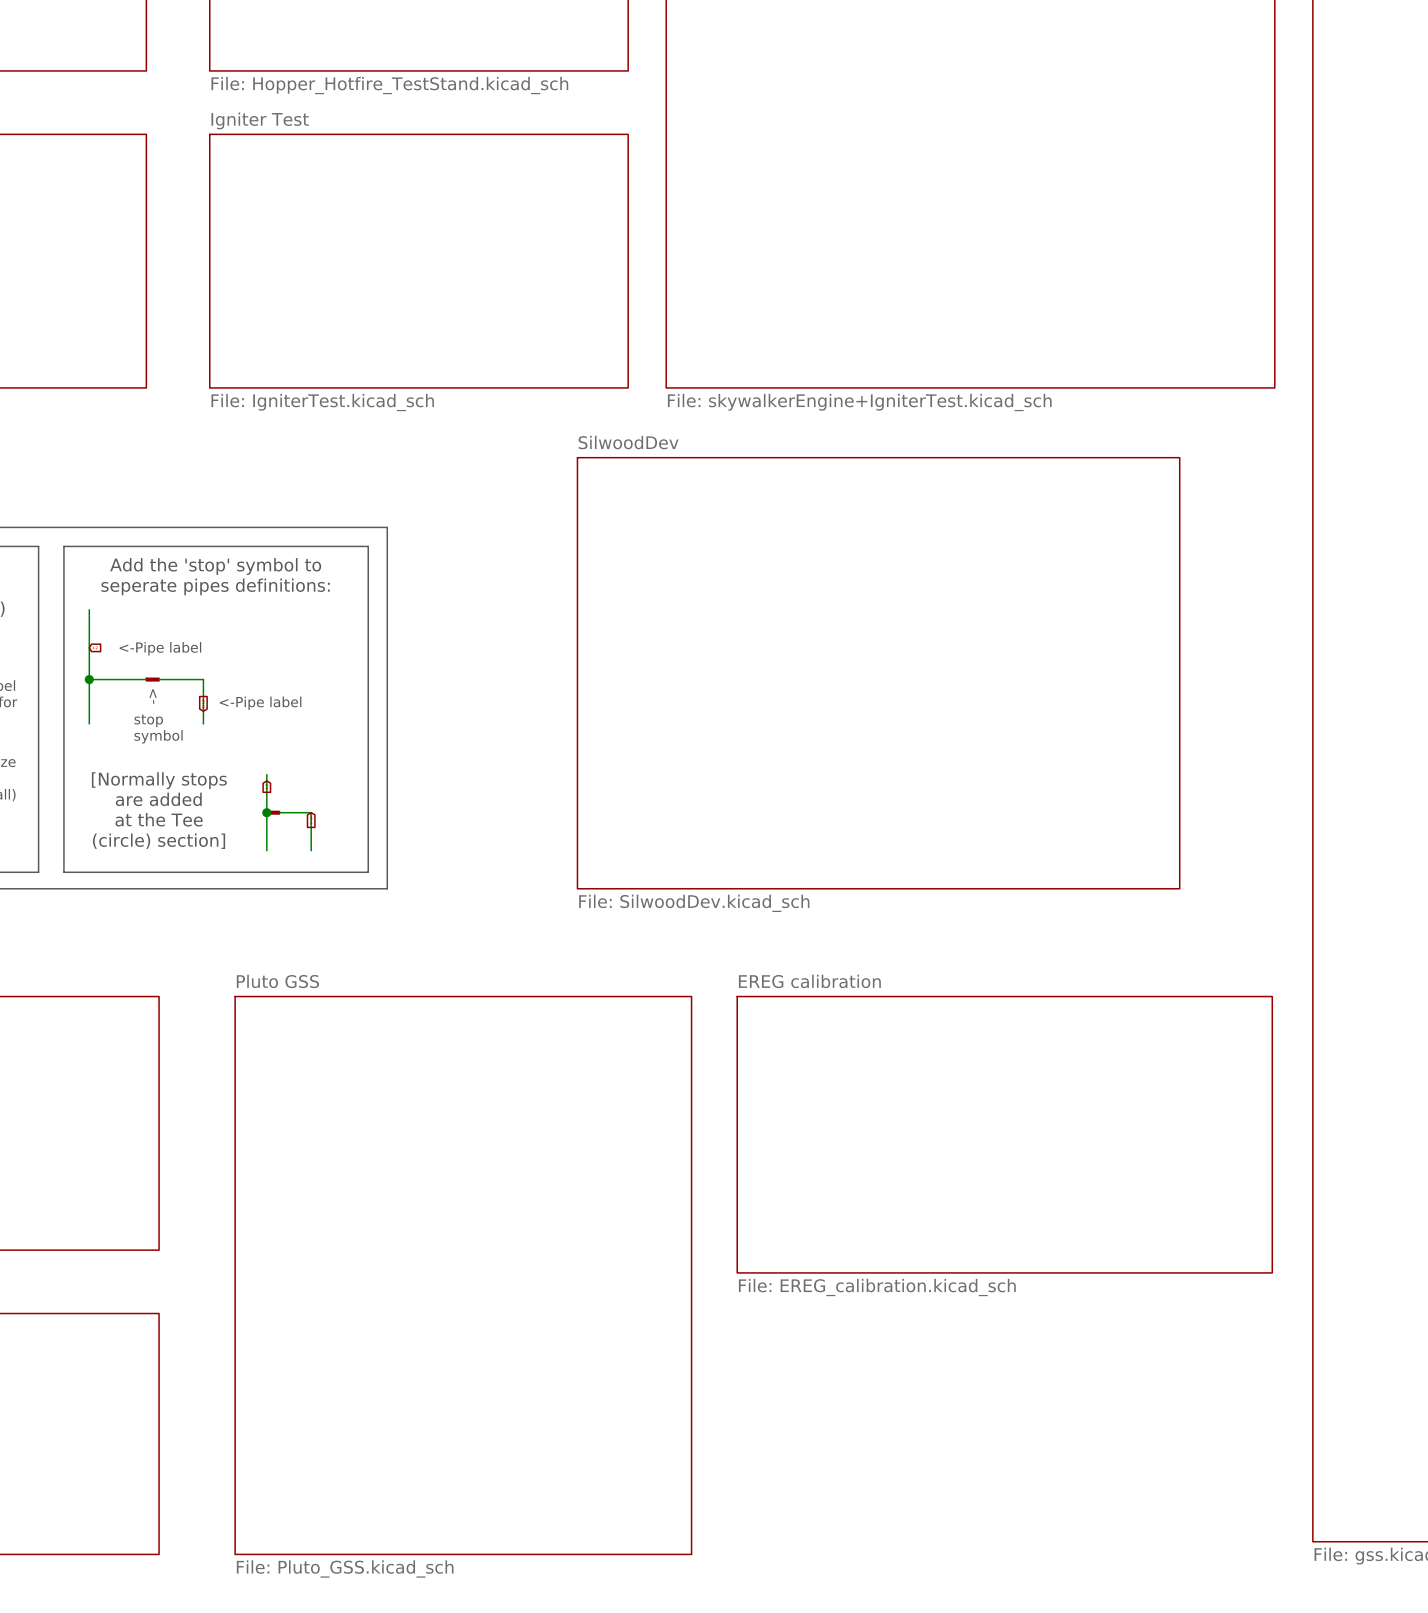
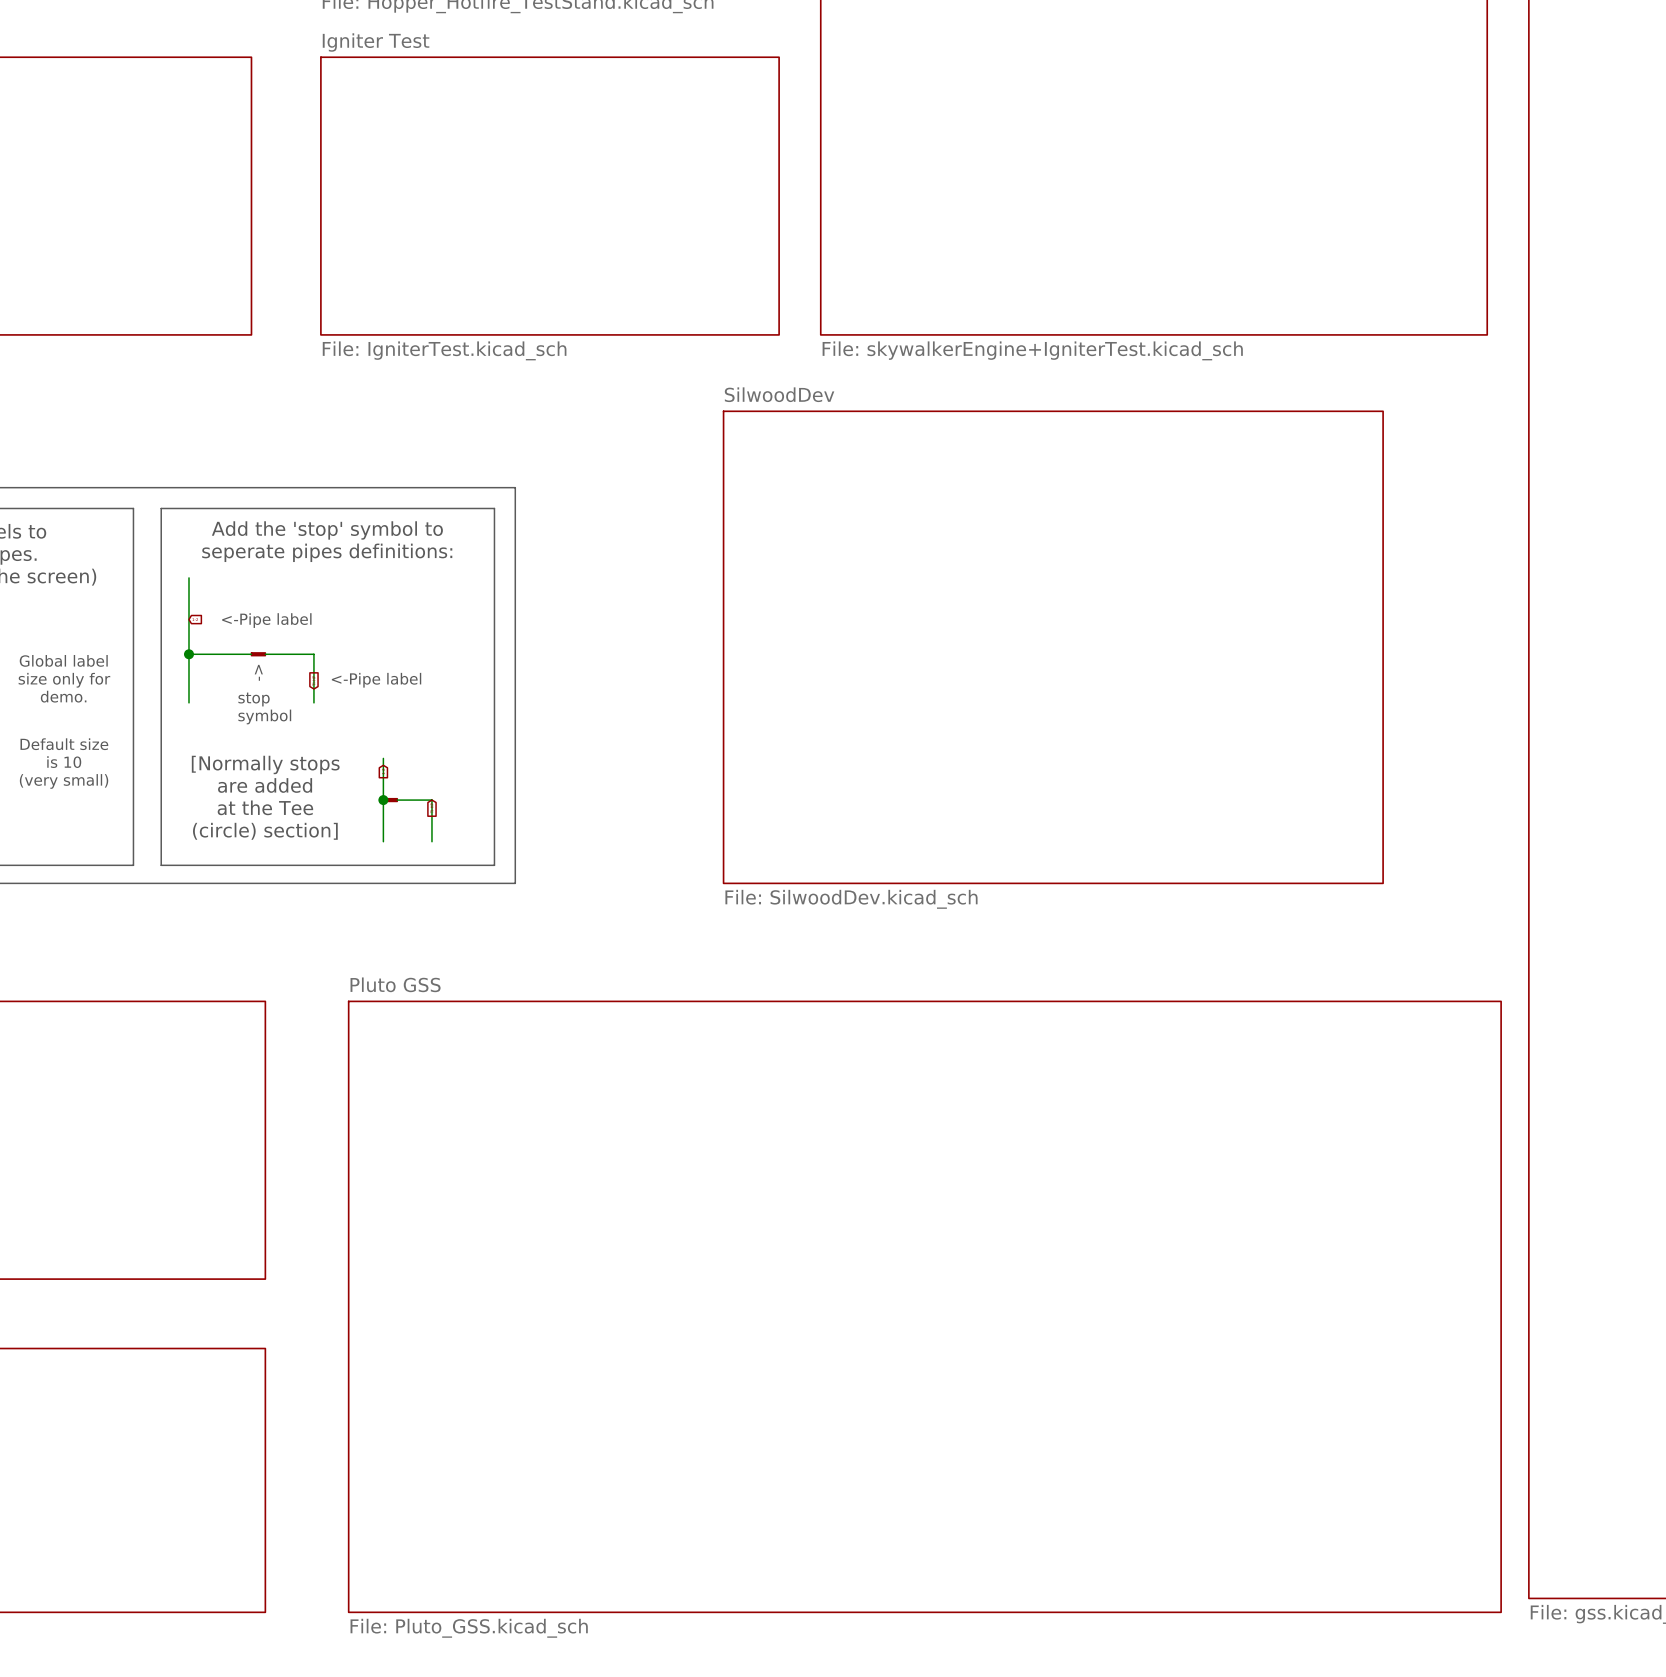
sheet EREG calibration: File: EREG_calibration.kicad_sch (1004, 1134) -> none
sheet Pluto GSS: File: Pluto_GSS.kicad_sch (463, 1275) -> none
sheet Pluto GSS: none -> File: Pluto_GSS.kicad_sch (924, 1306)

